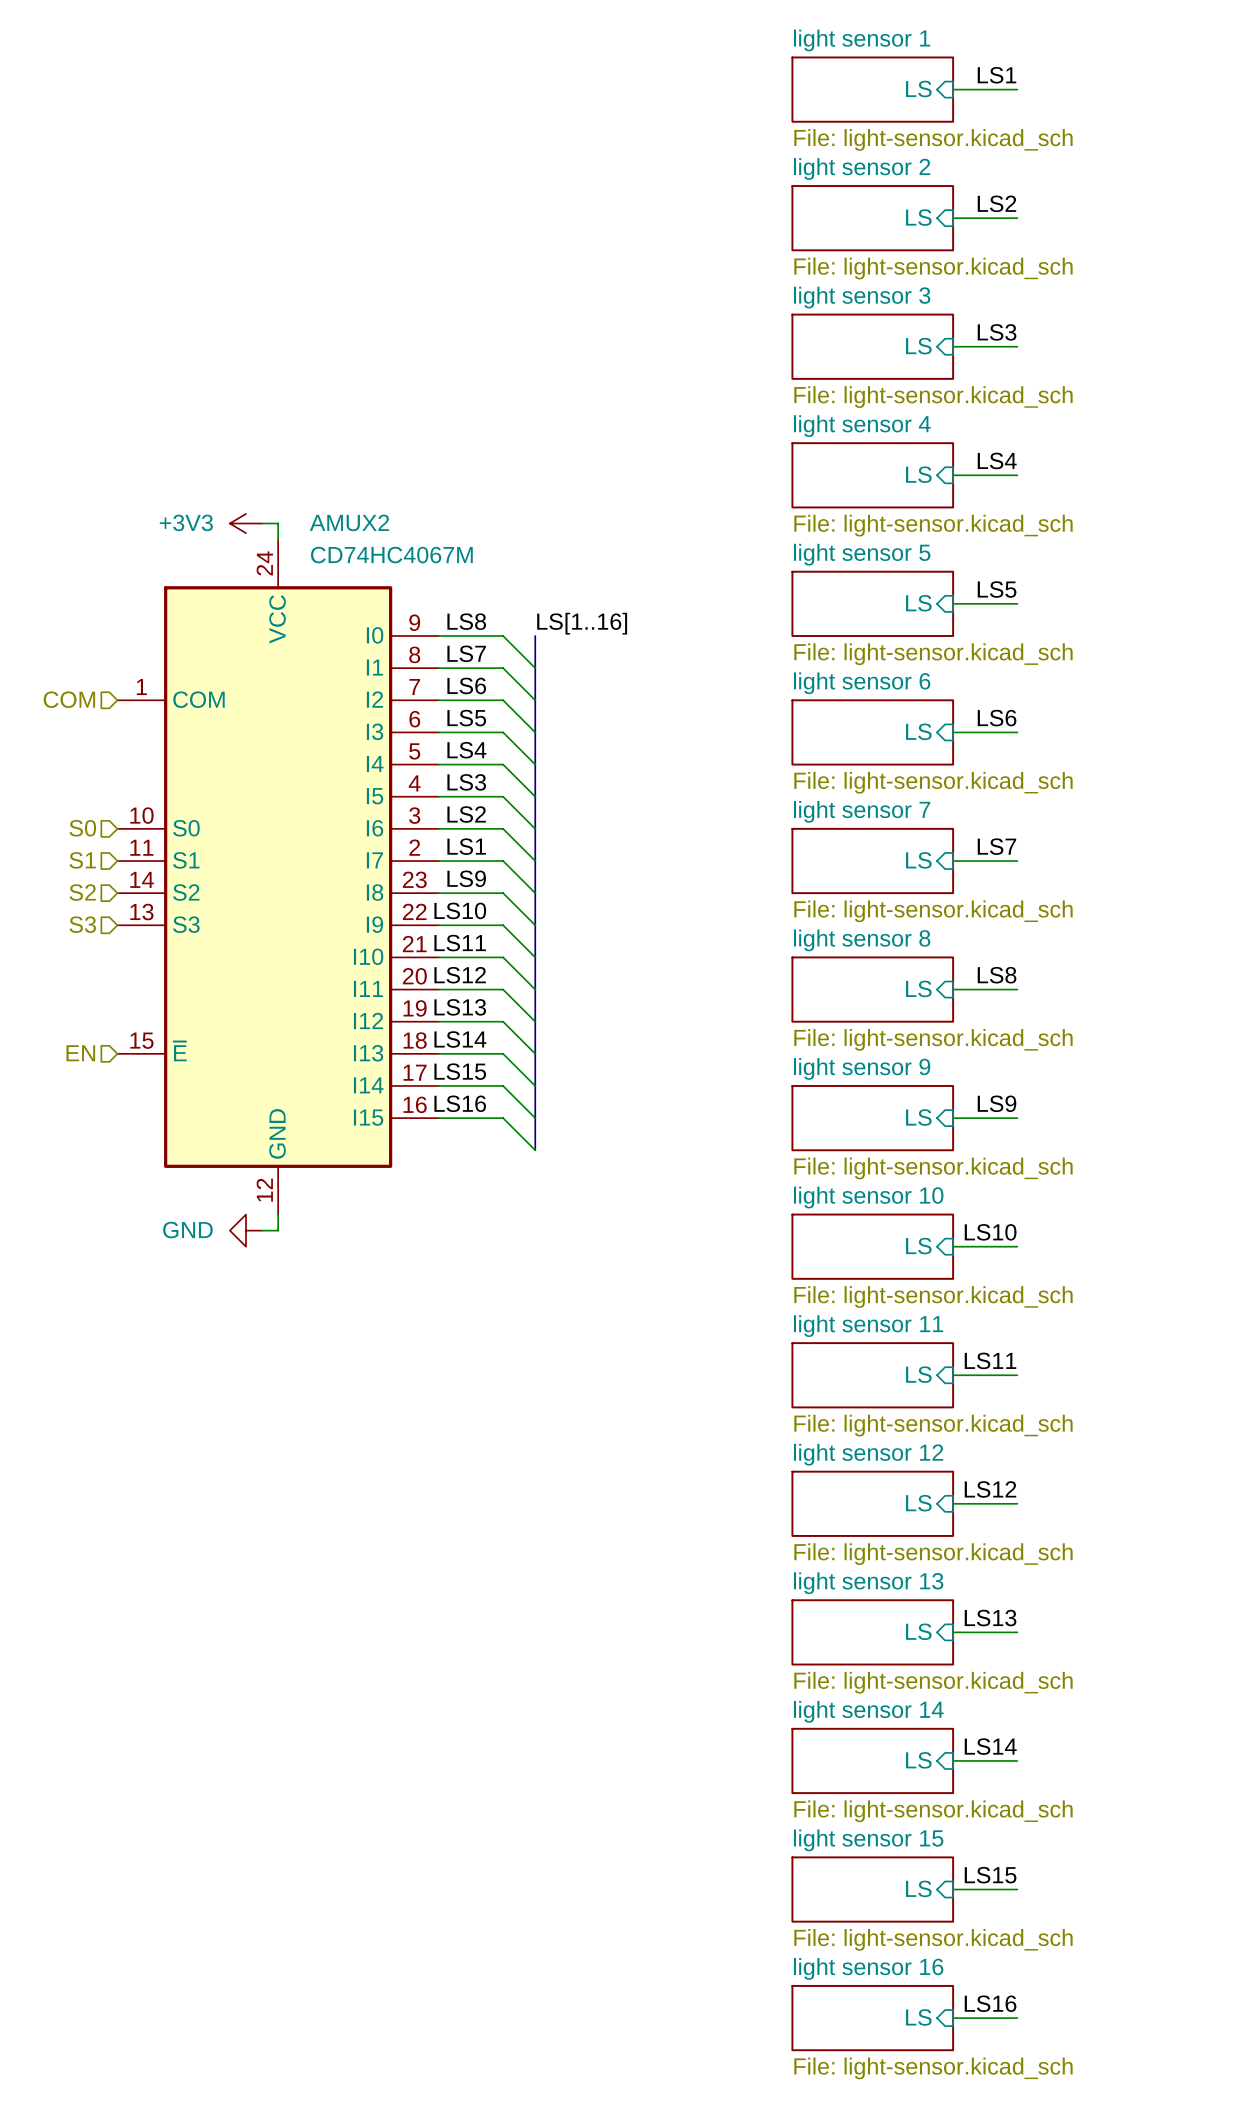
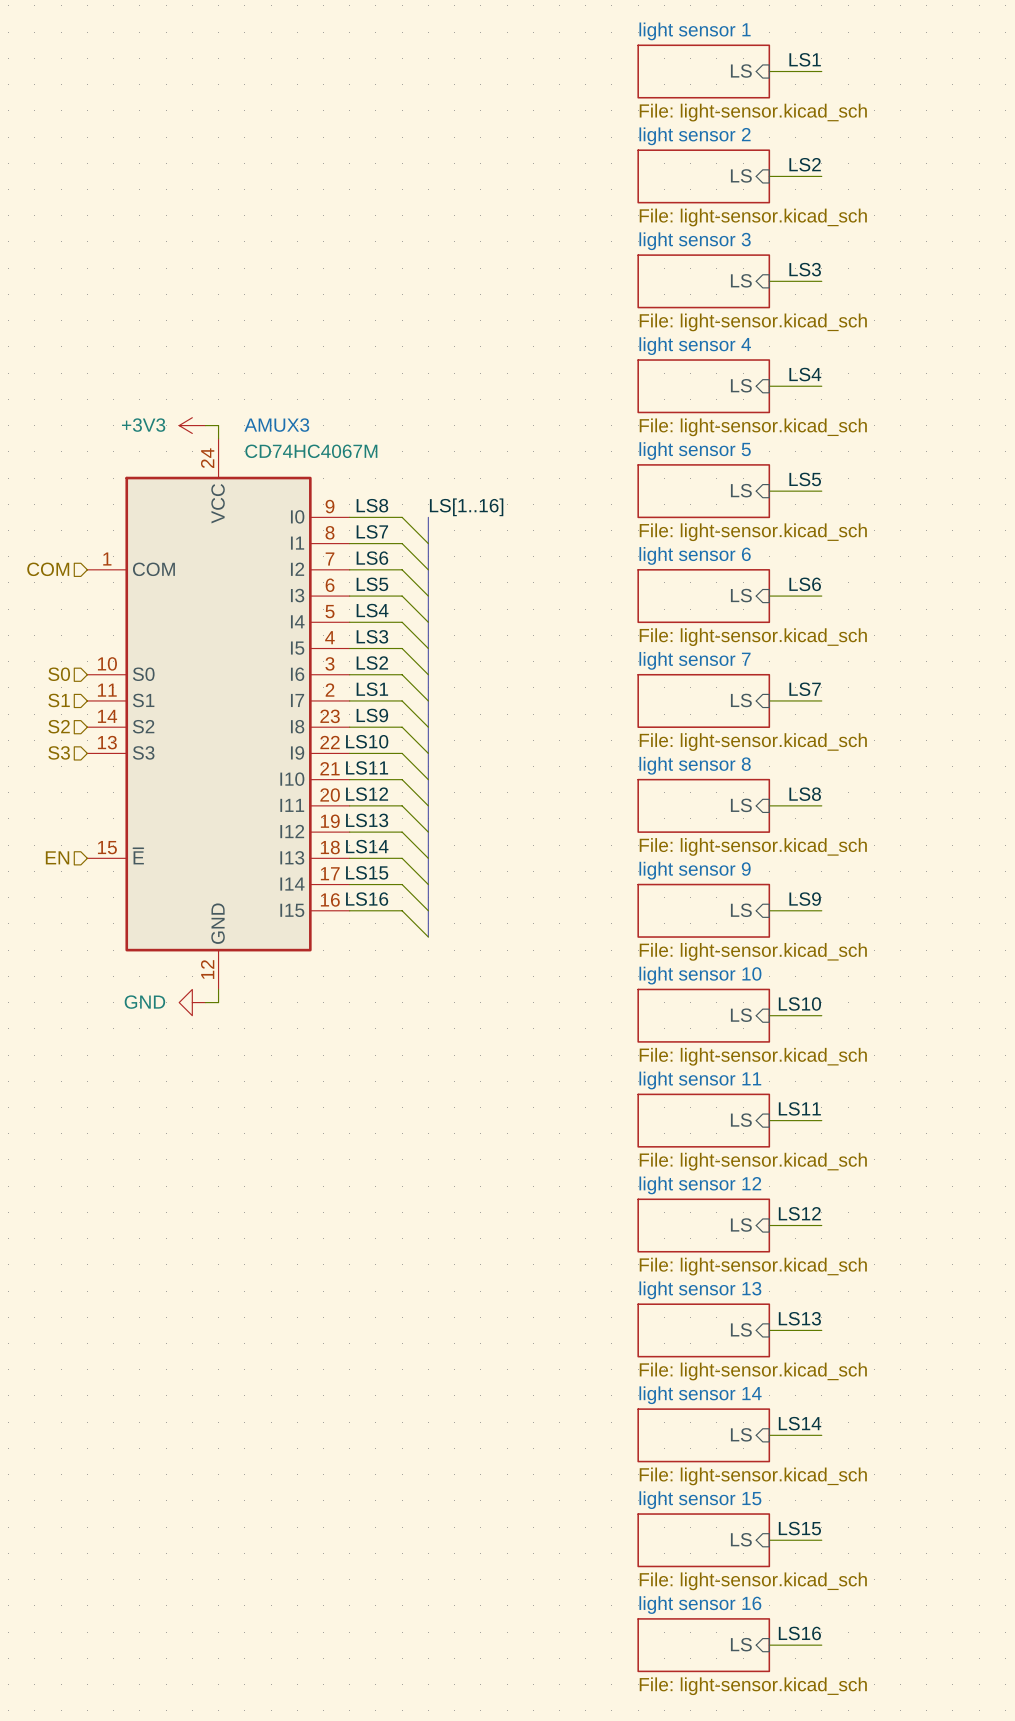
AMUX2 name: AMUX2 (349, 522) -> AMUX3 (276, 425)

